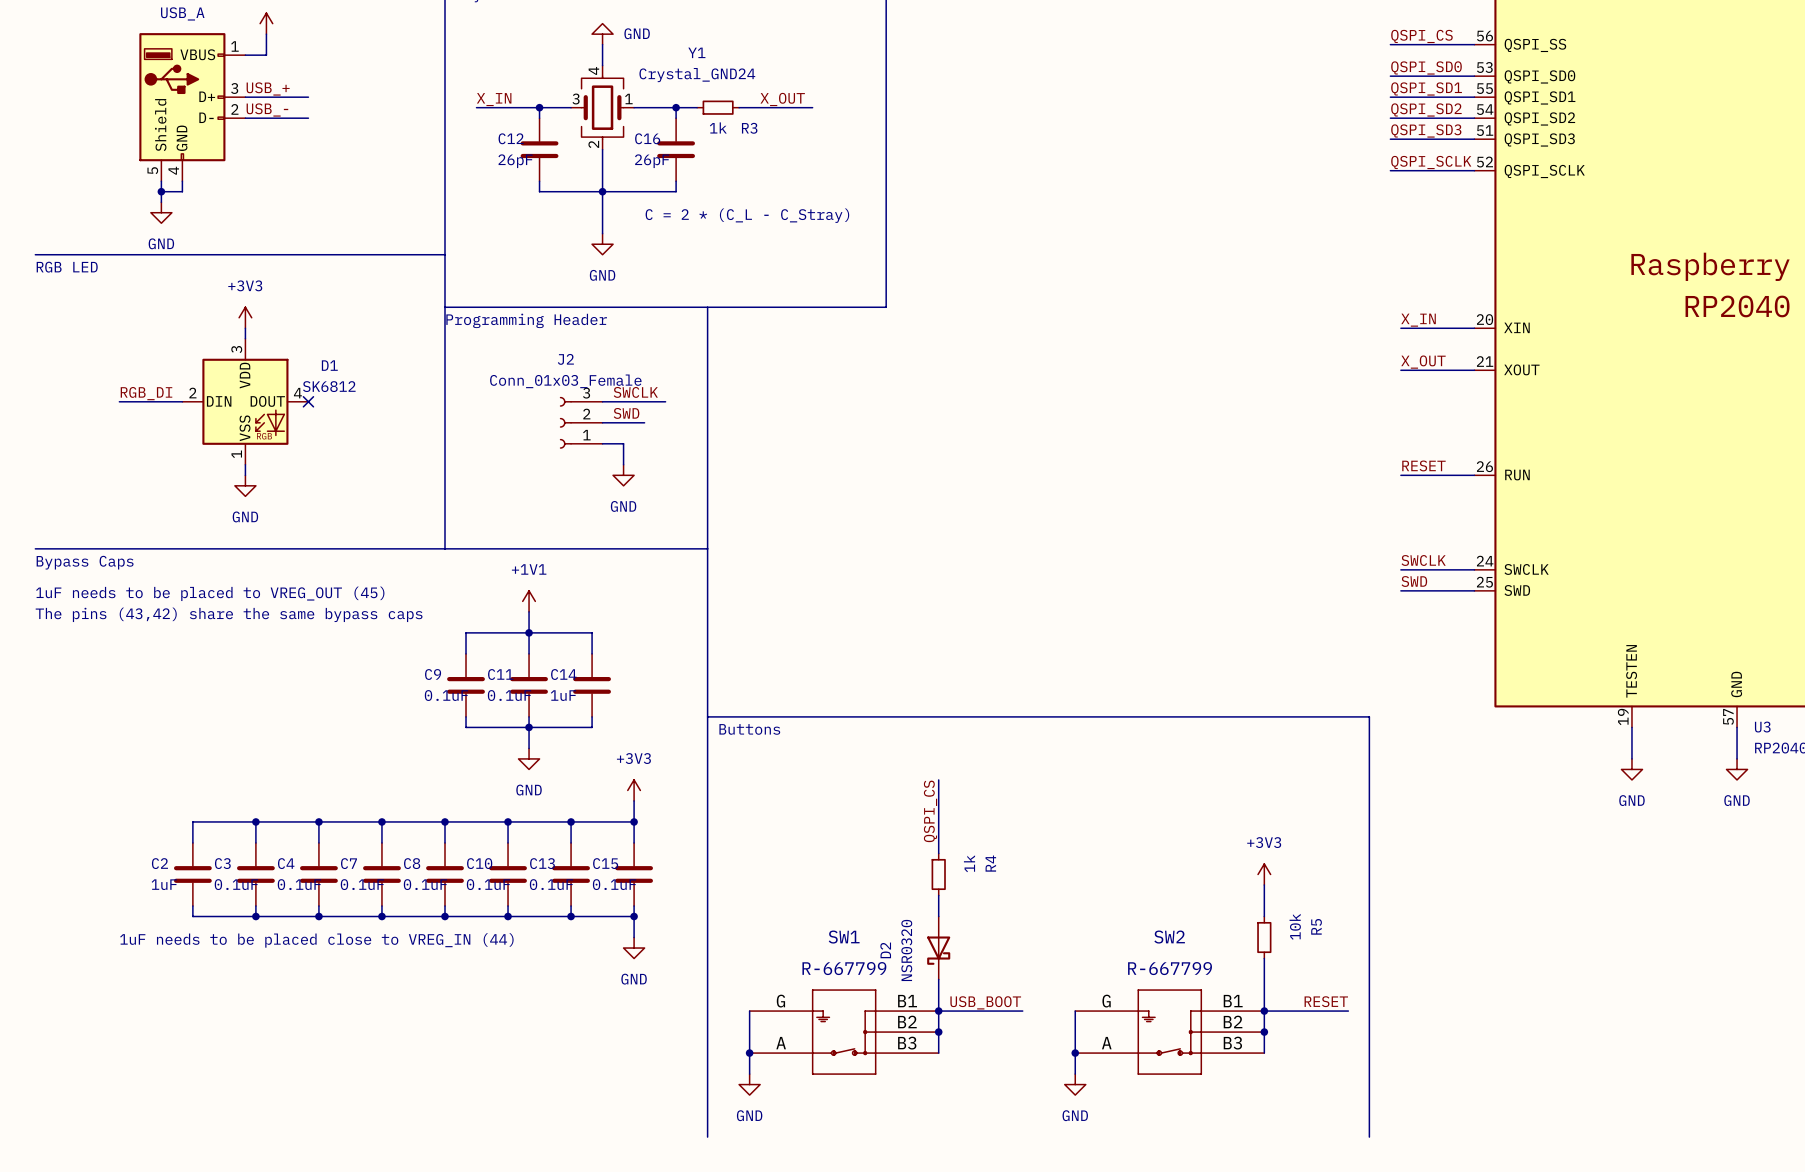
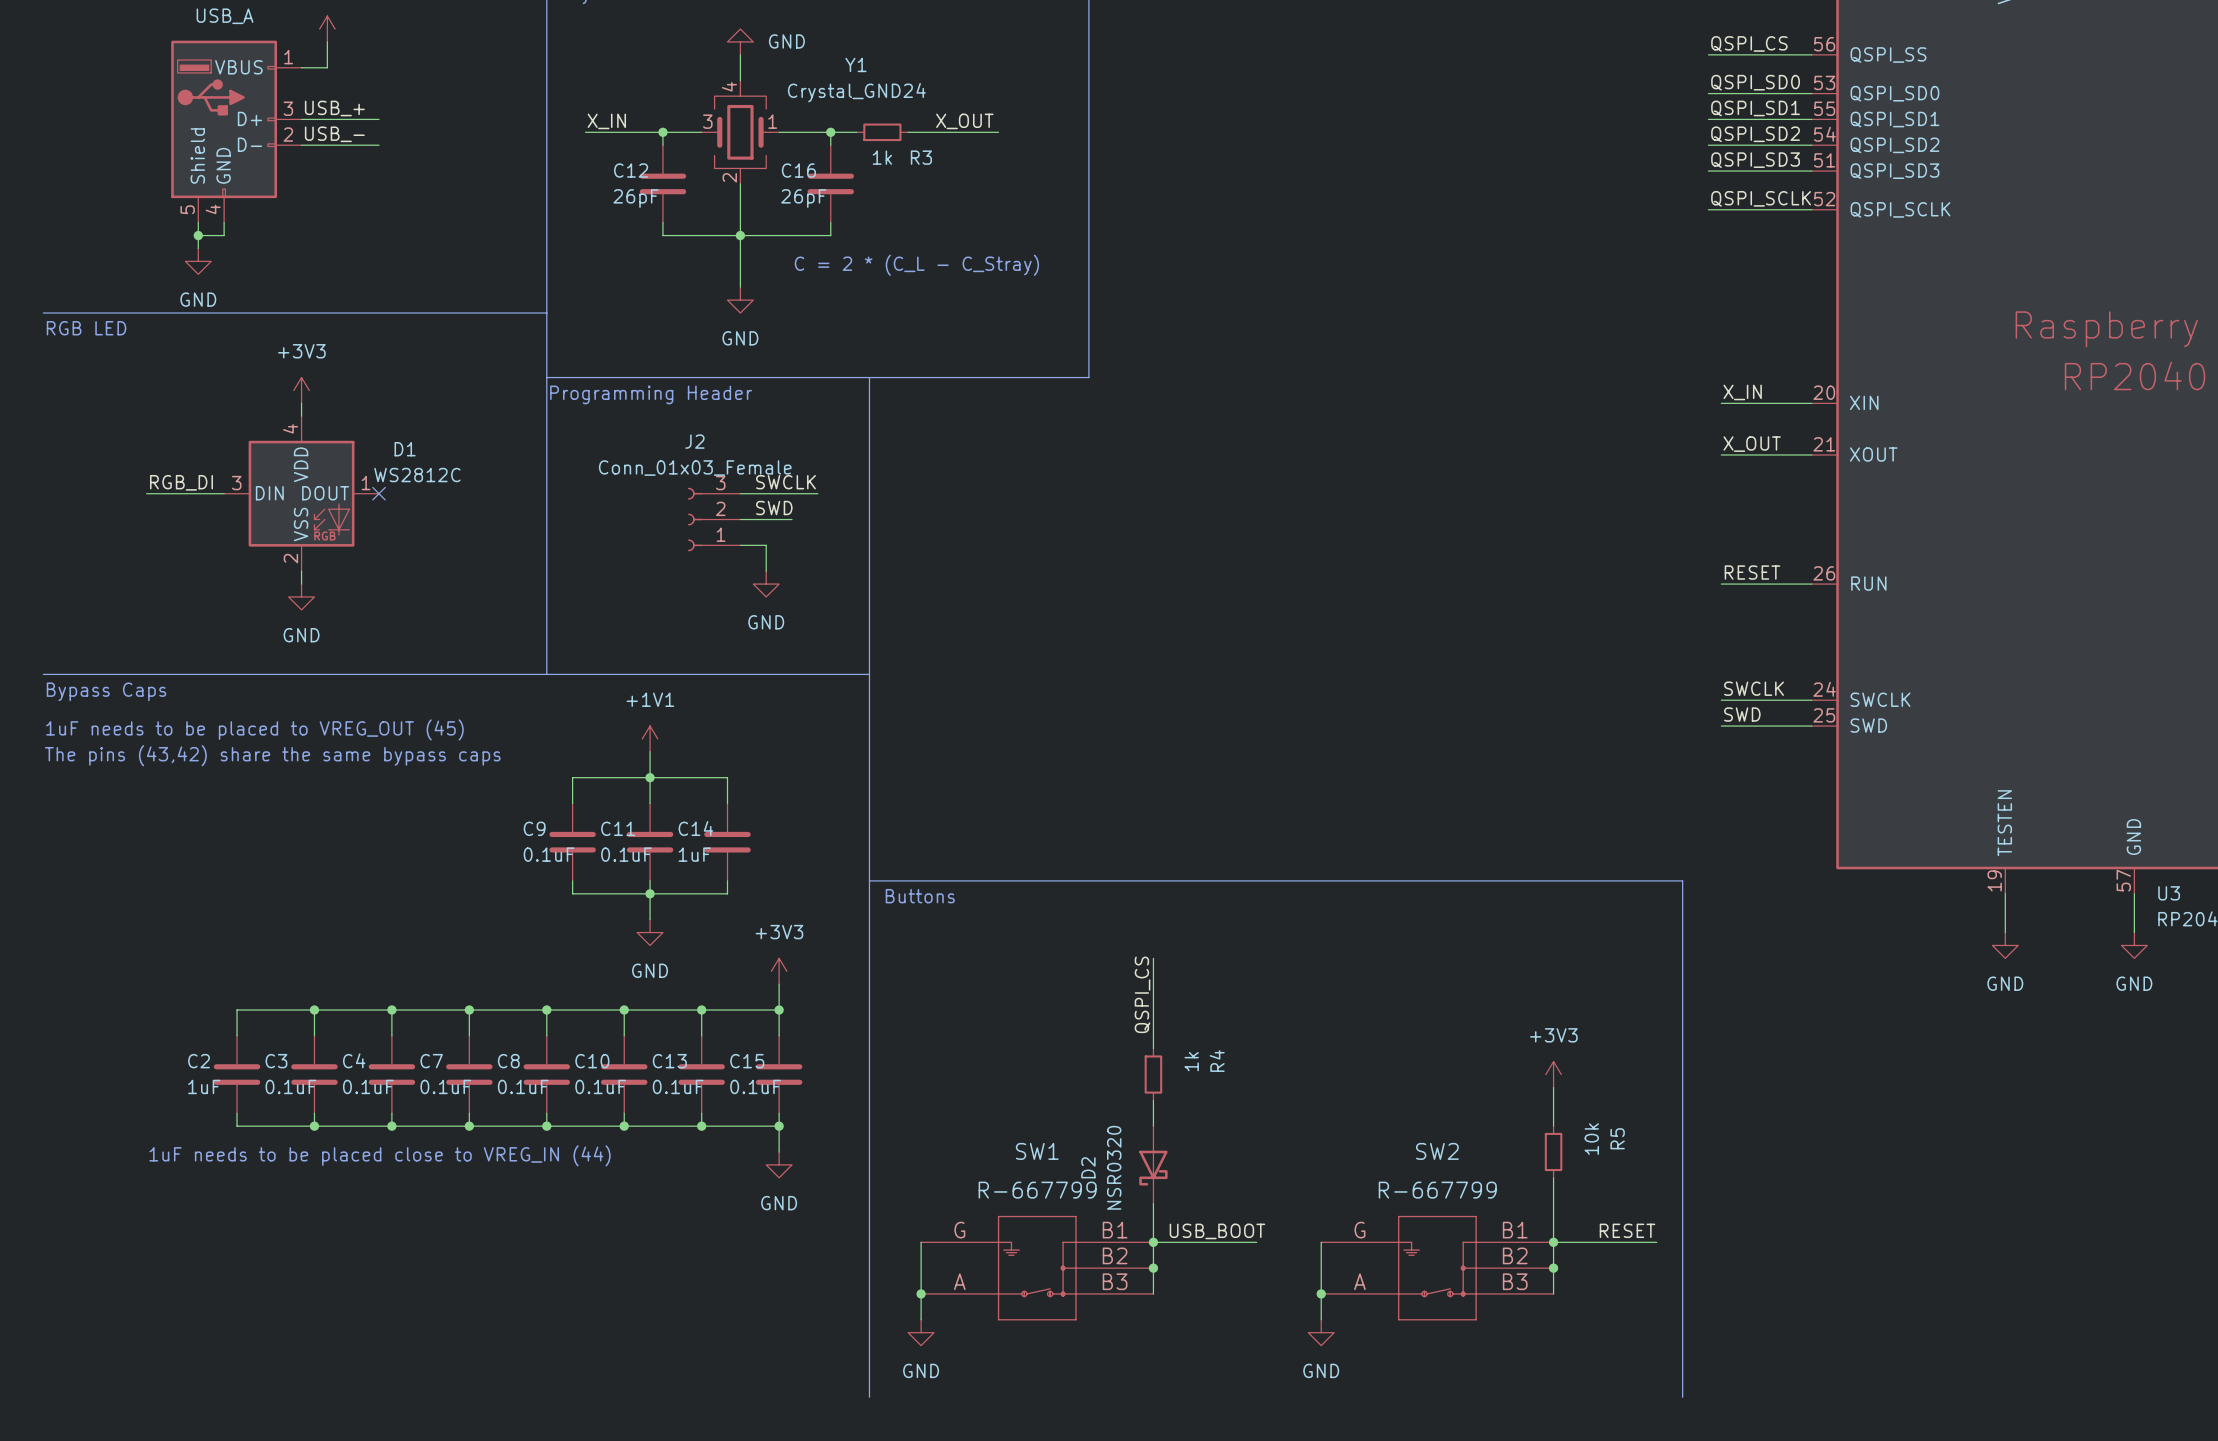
D1 pin number: 3 (236, 349) -> 4 (290, 428)
D1 value: SK6812 (329, 386) -> WS2812C (417, 475)
D1 pin number: 2 (192, 393) -> 3 (236, 483)
D1 pin number: 4 (297, 393) -> 1 (366, 483)
D1 pin number: 1 (236, 454) -> 2 (290, 558)

